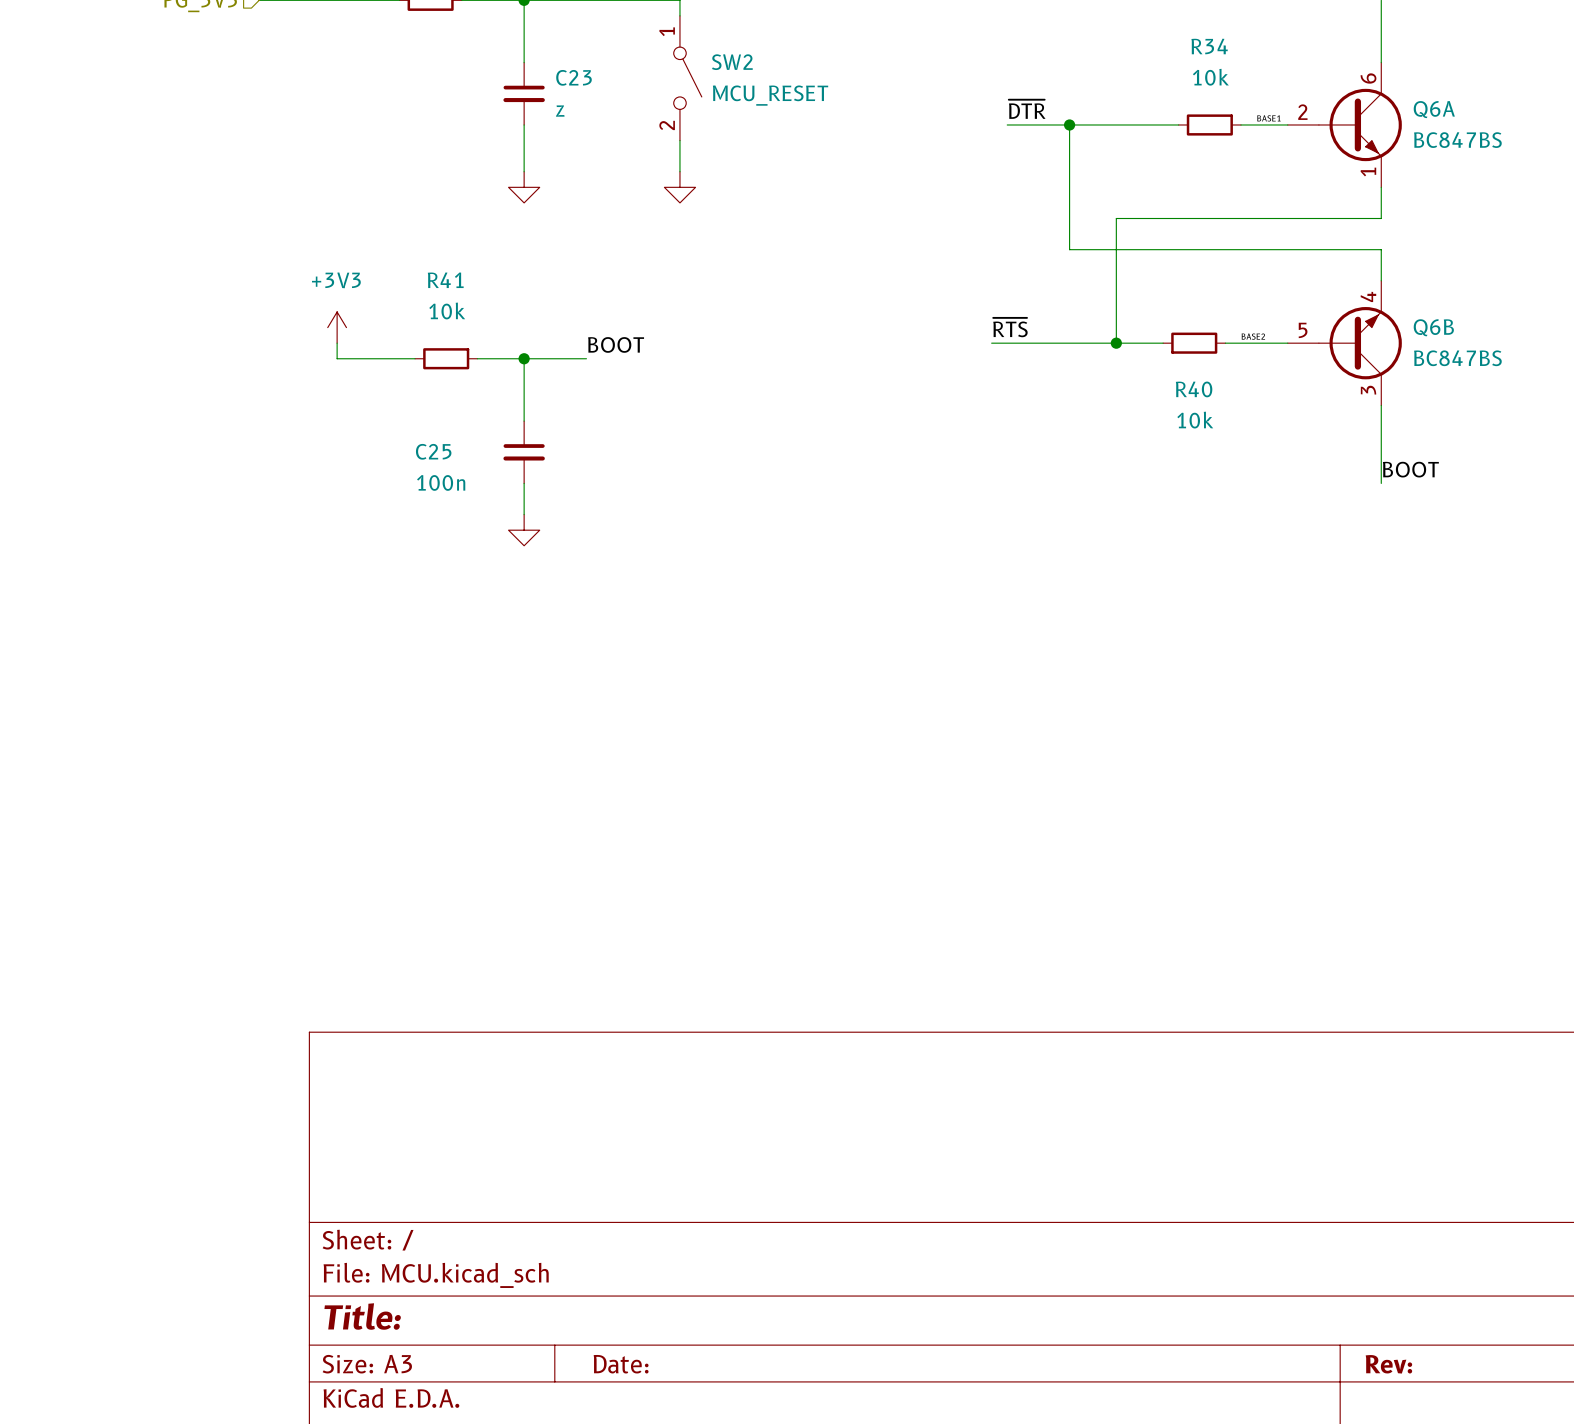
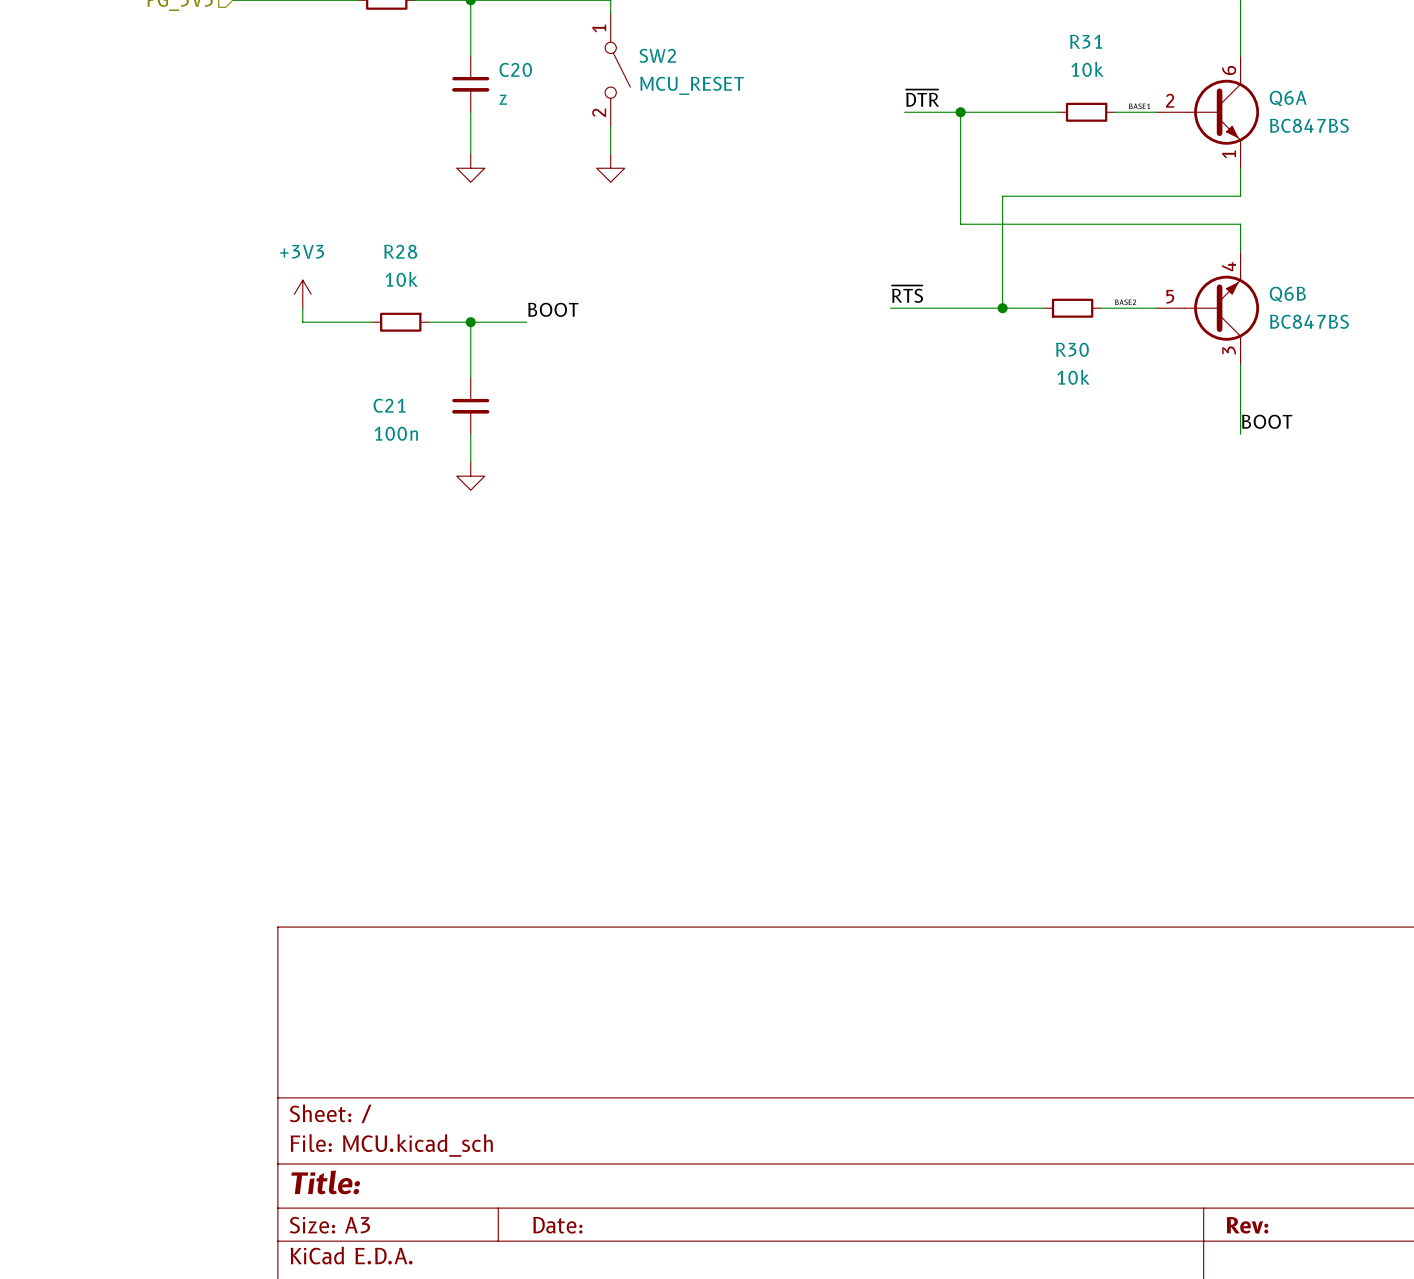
R34 name: R34 (1209, 46) -> R31 (1086, 41)
C23 name: C23 (573, 77) -> C20 (515, 69)
R41 name: R41 (445, 280) -> R28 (400, 251)
R40 name: R40 (1194, 389) -> R30 (1072, 349)
C25 name: C25 (433, 451) -> C21 (389, 405)

